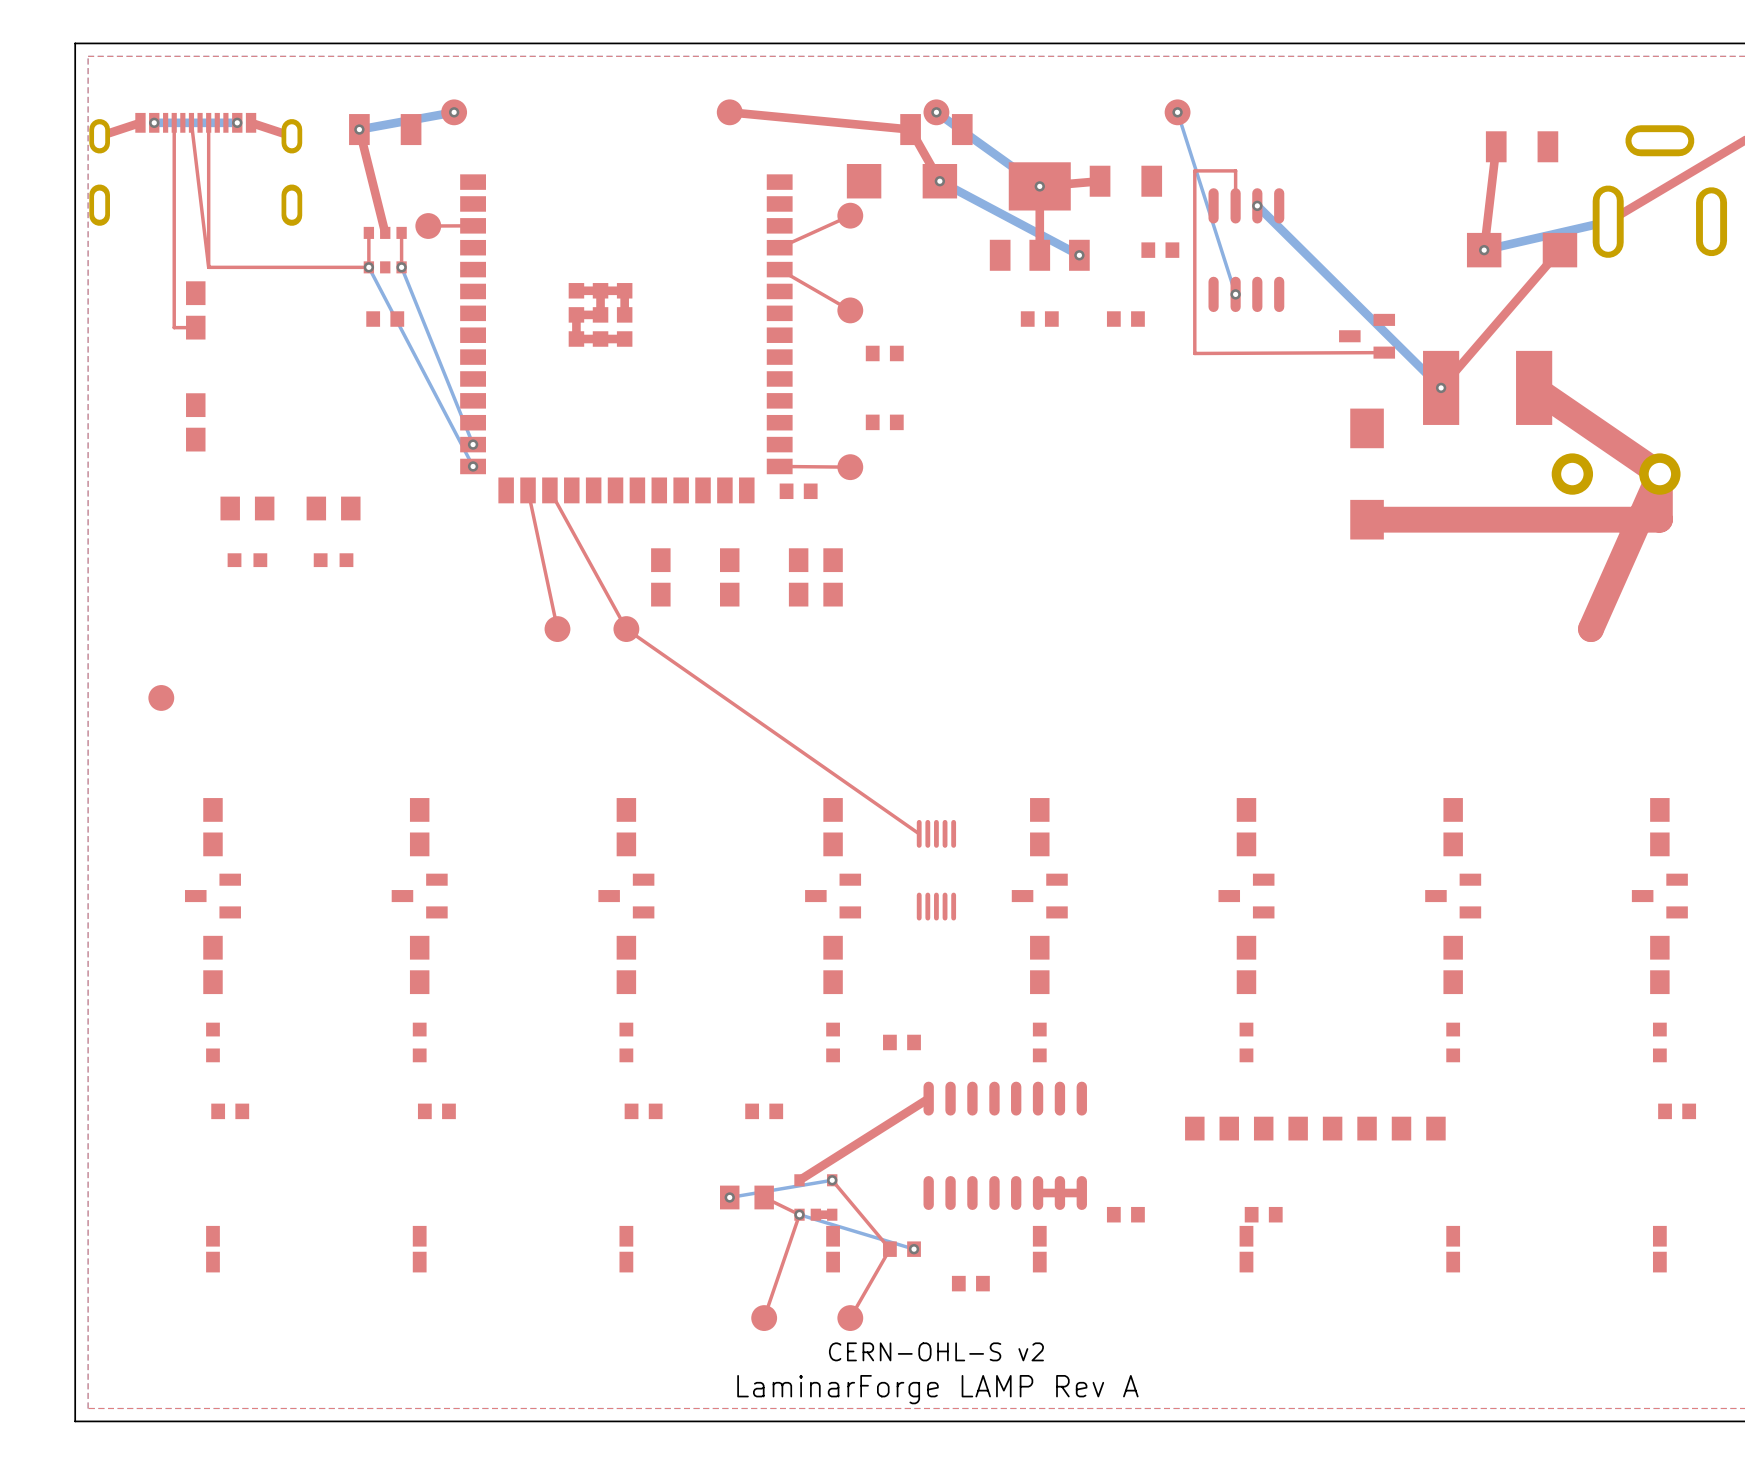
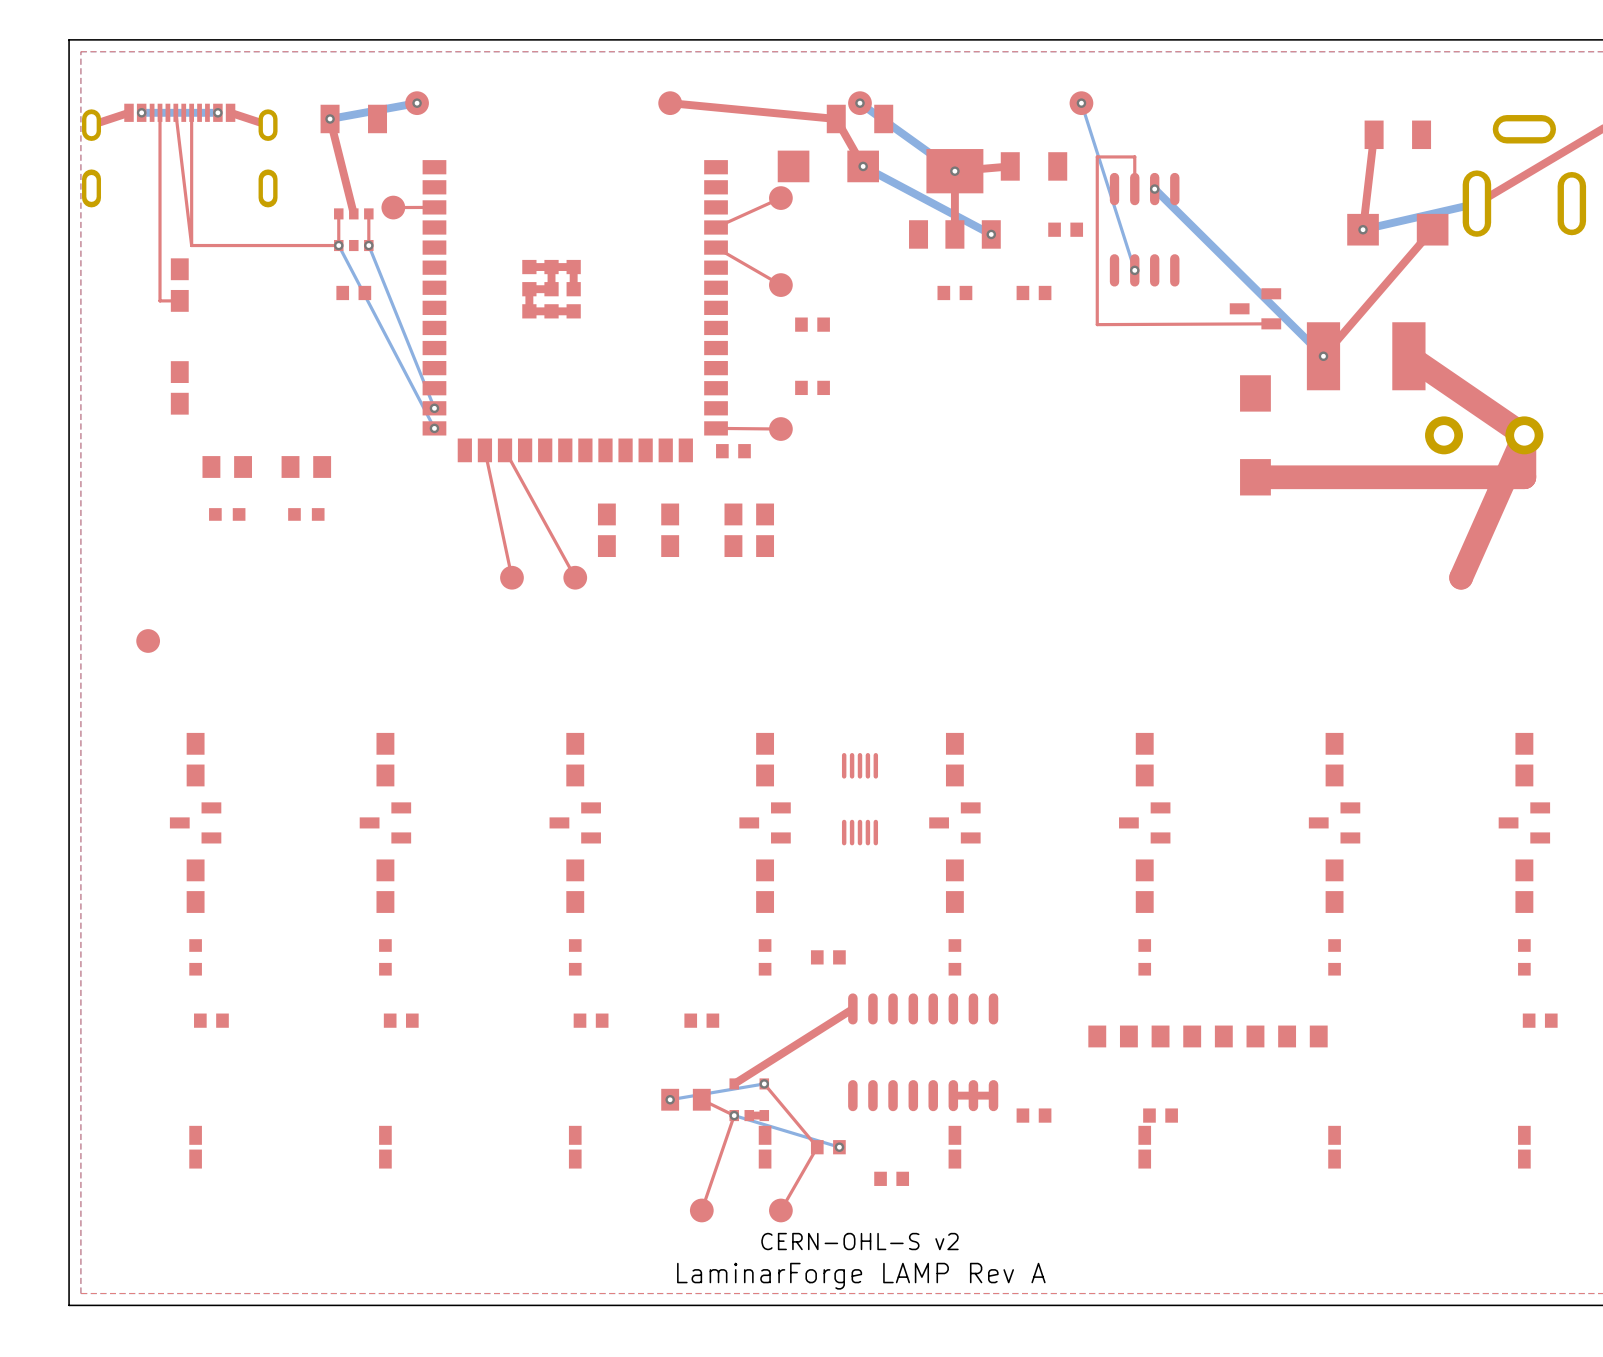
top track: (626, 629) (919, 833) -> none

